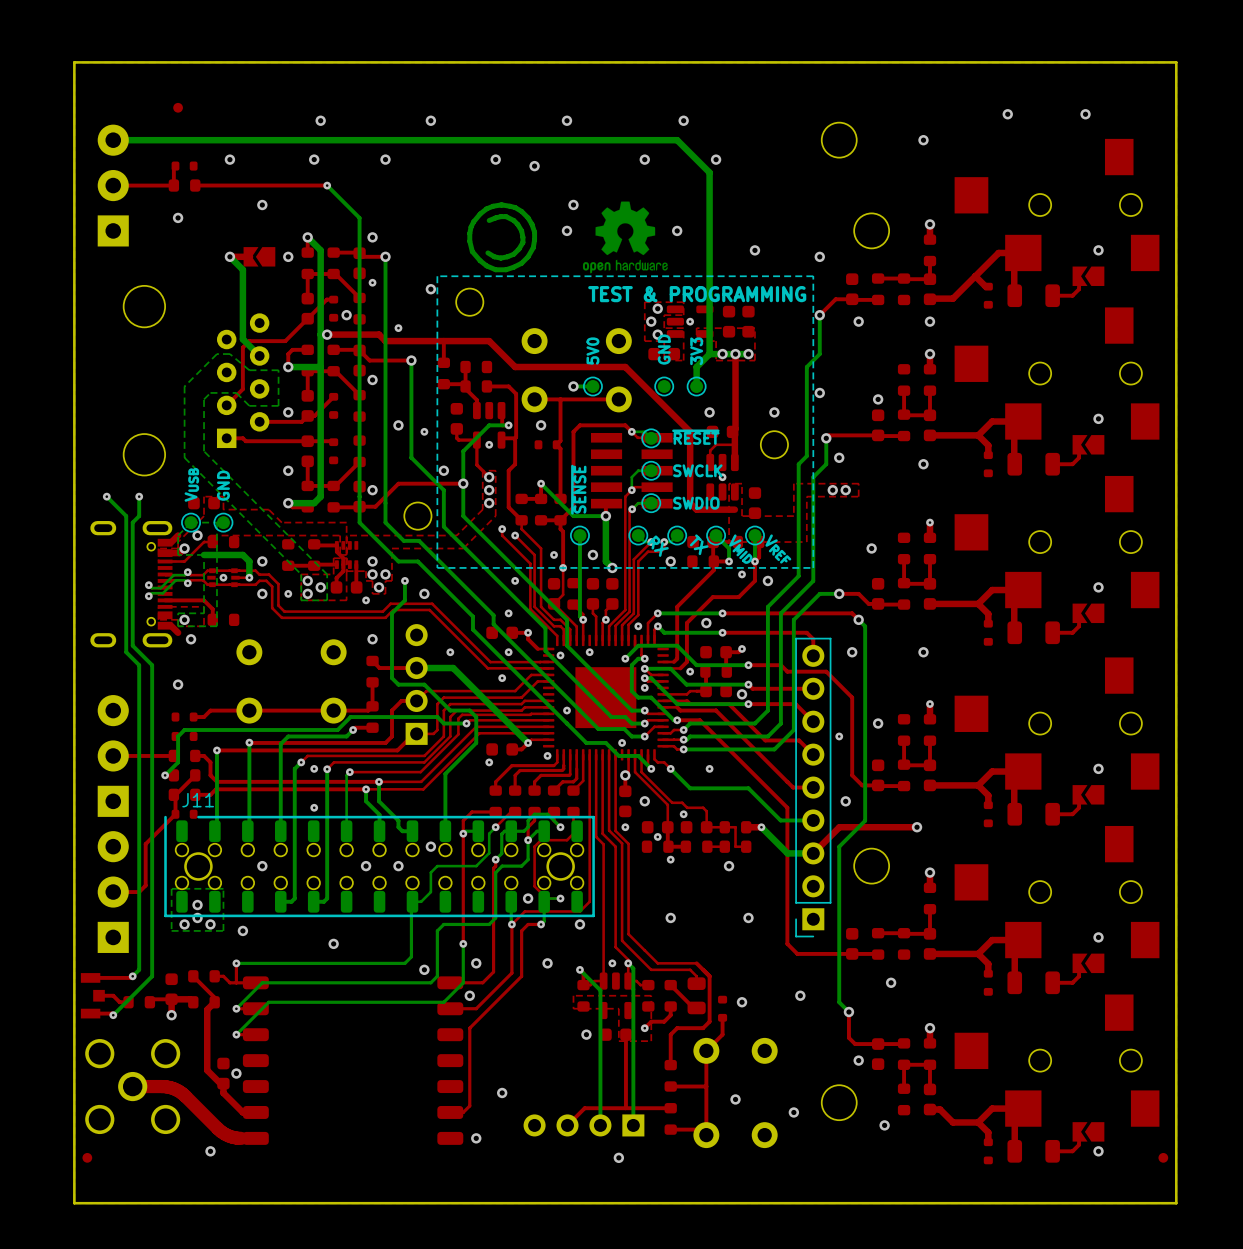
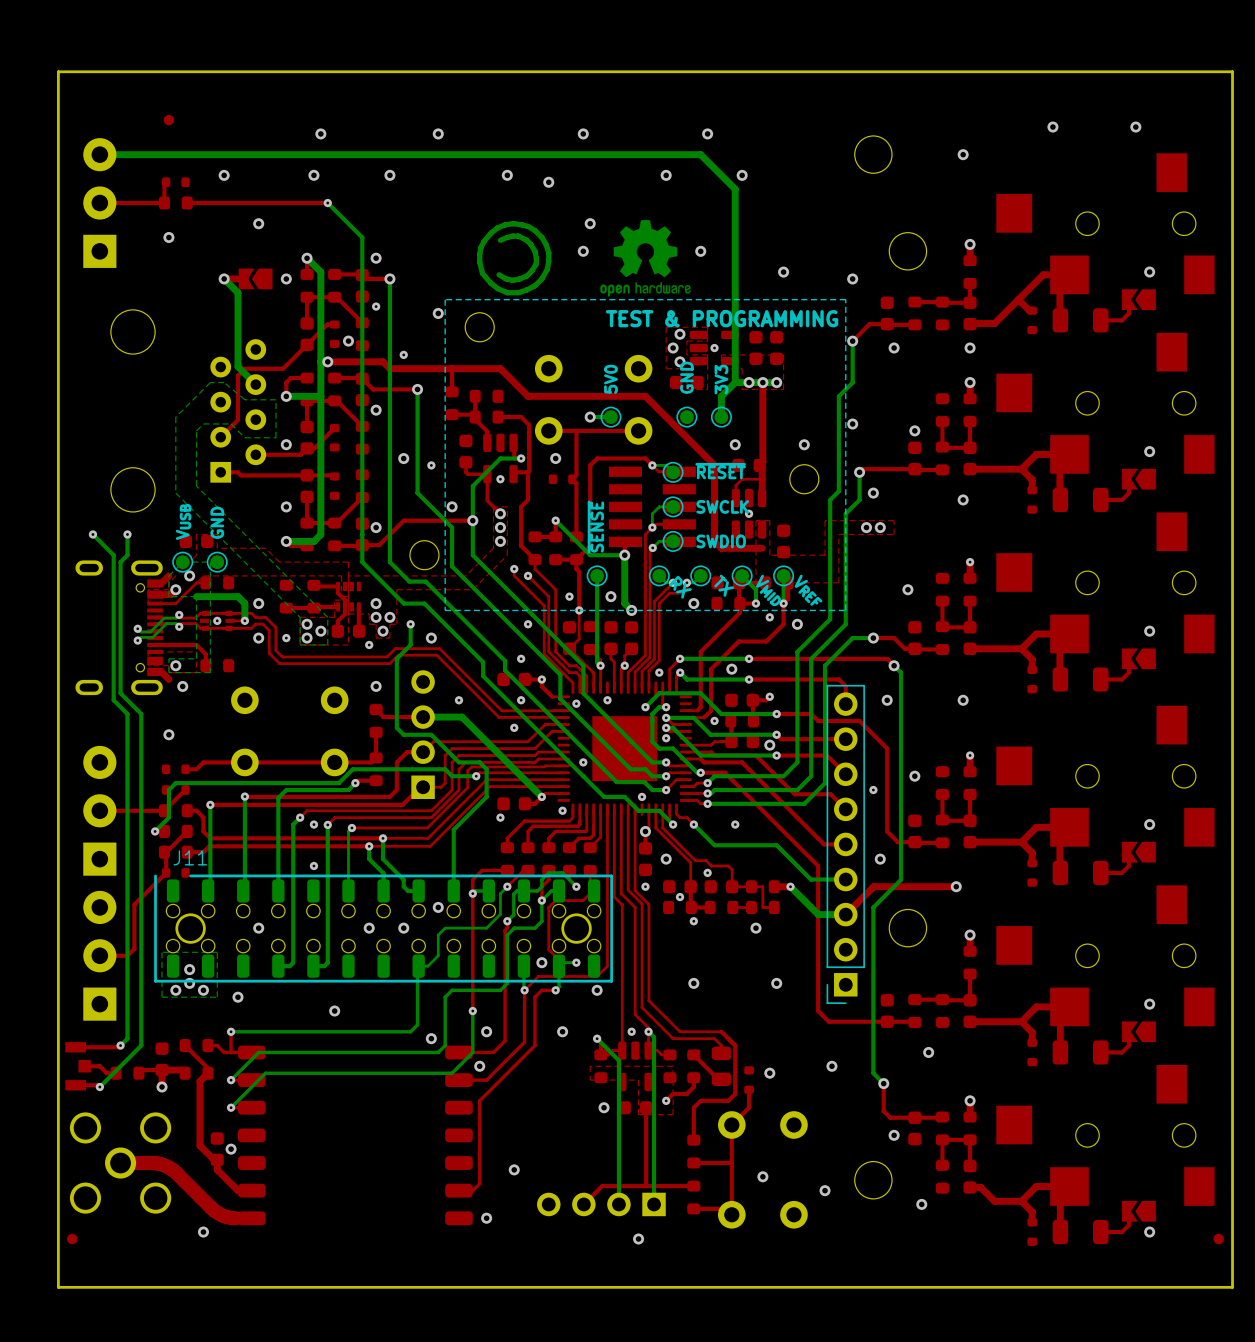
top track: none -> (185, 790) (164, 810)

